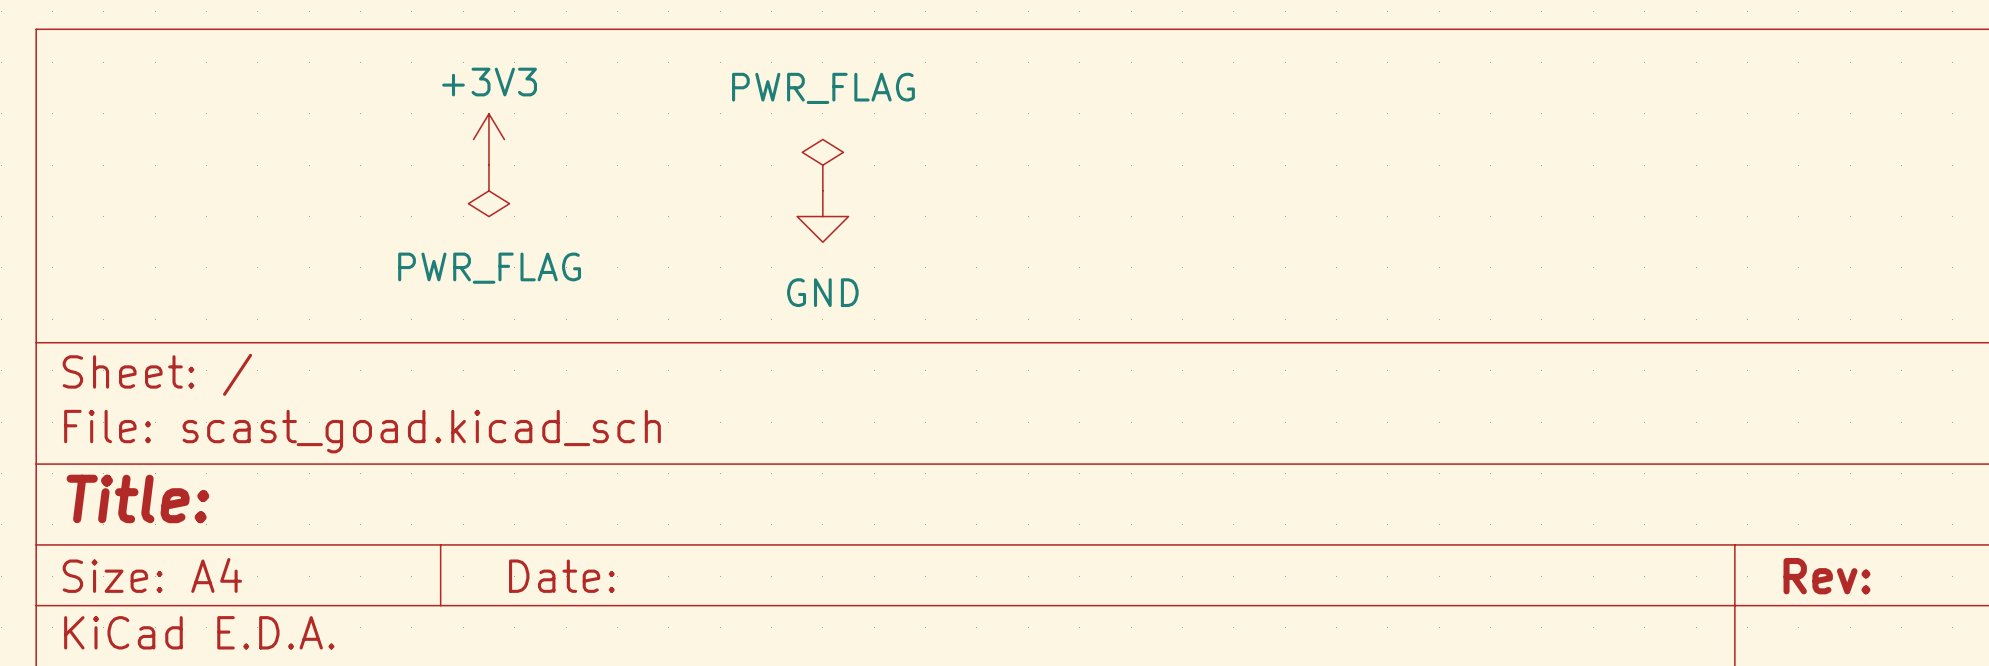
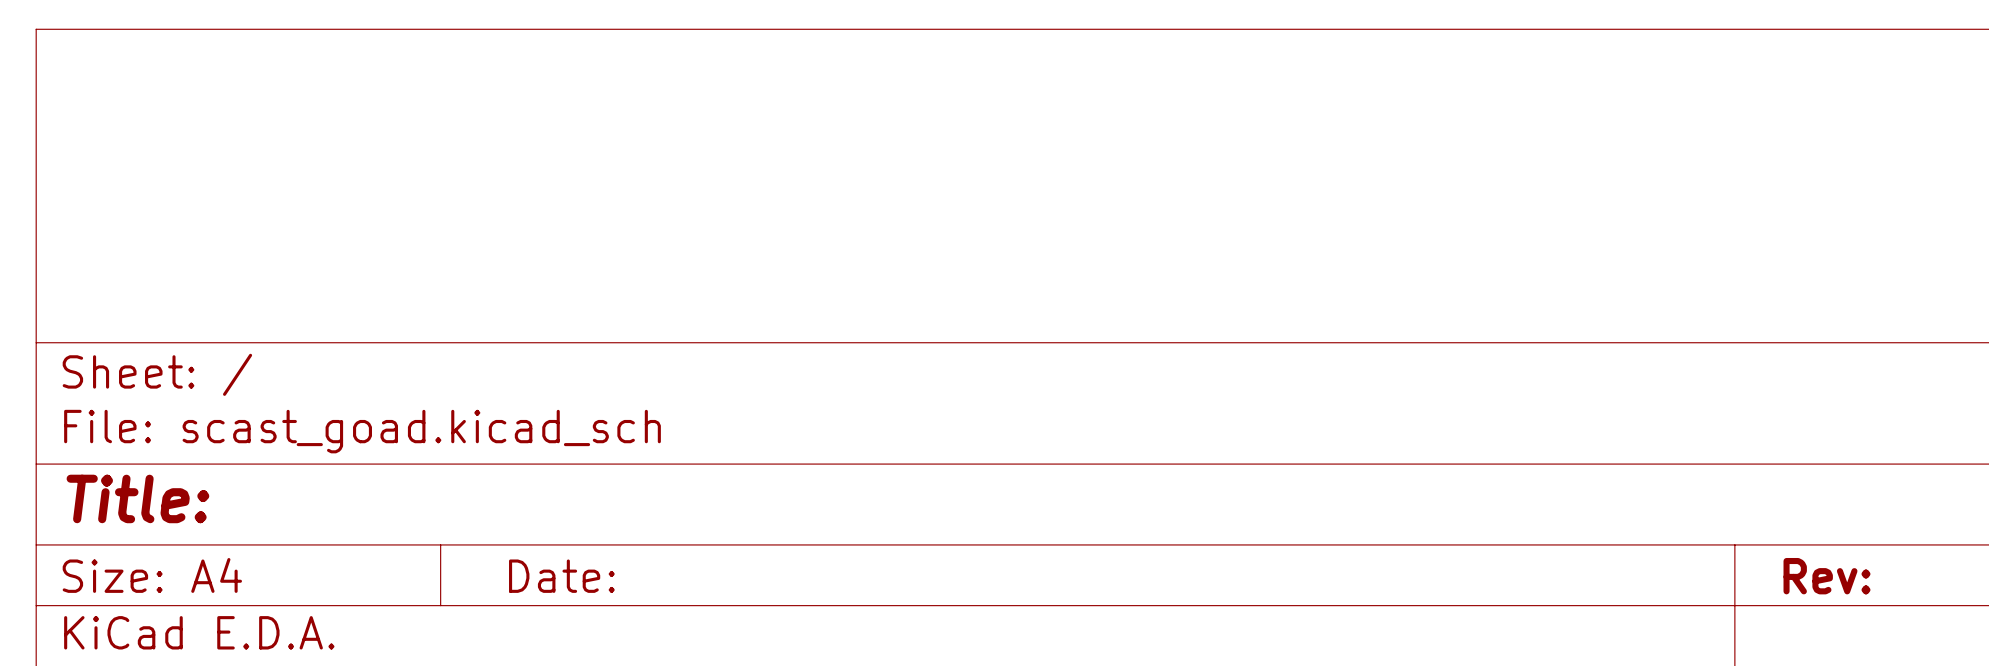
power symbol: +3V3 (488, 139) -> none
power symbol: PWR_FLAG (822, 165) -> none
power symbol: PWR_FLAG (488, 190) -> none
power symbol: GND (822, 216) -> none

